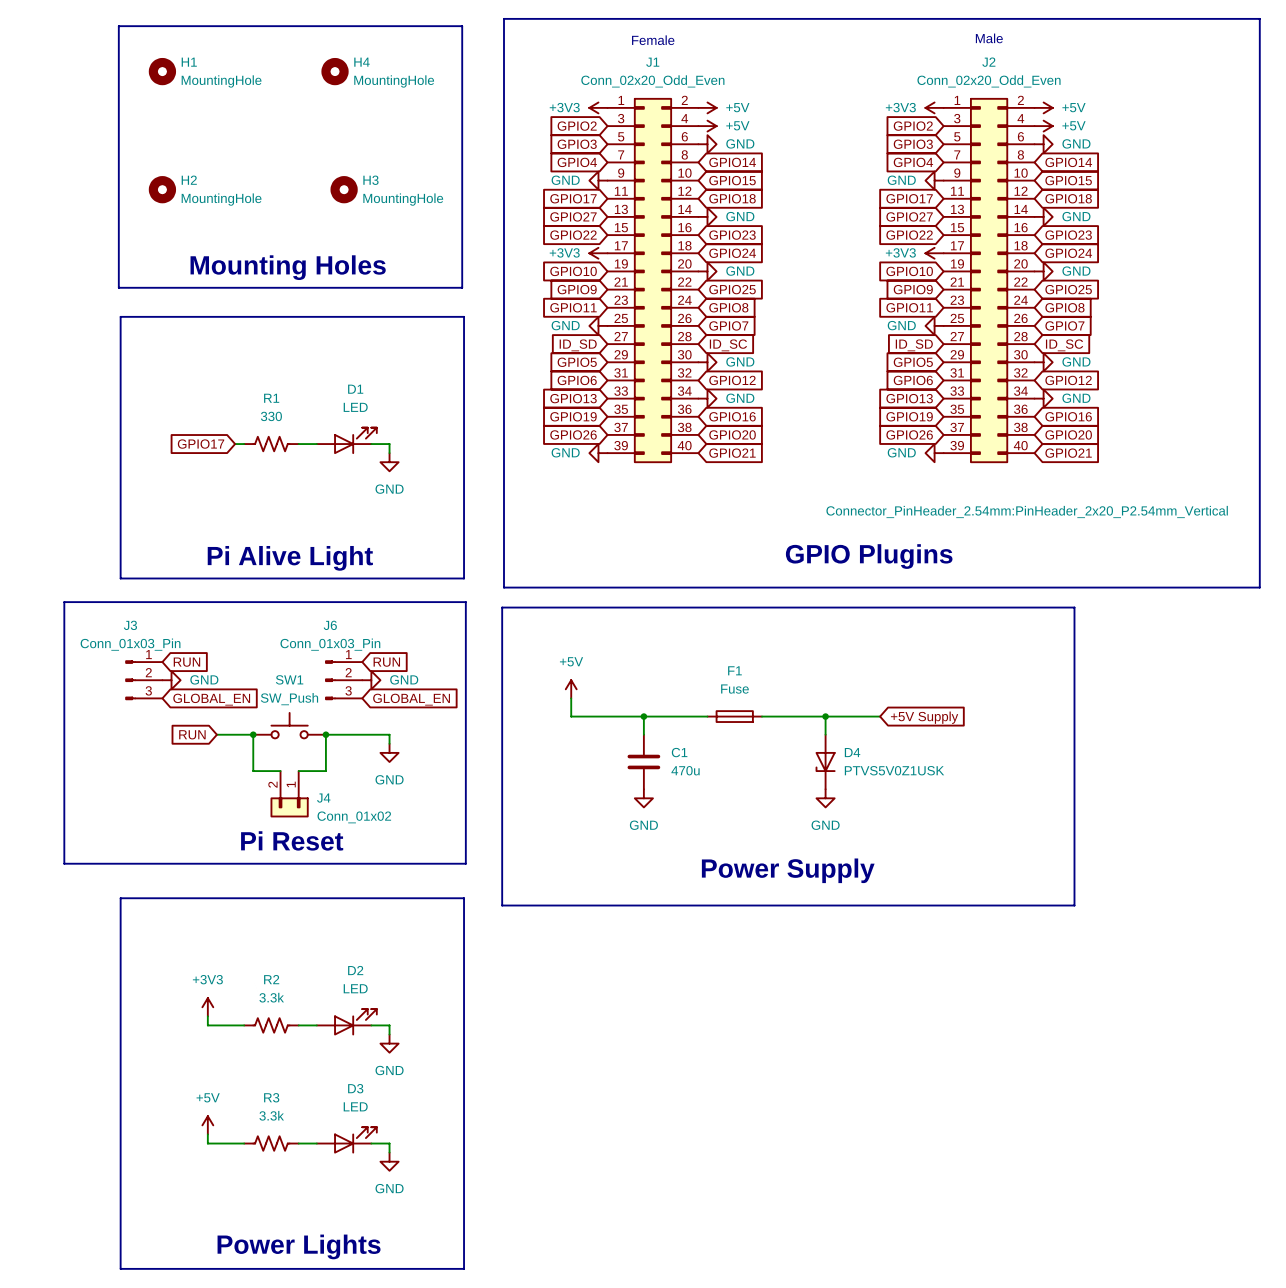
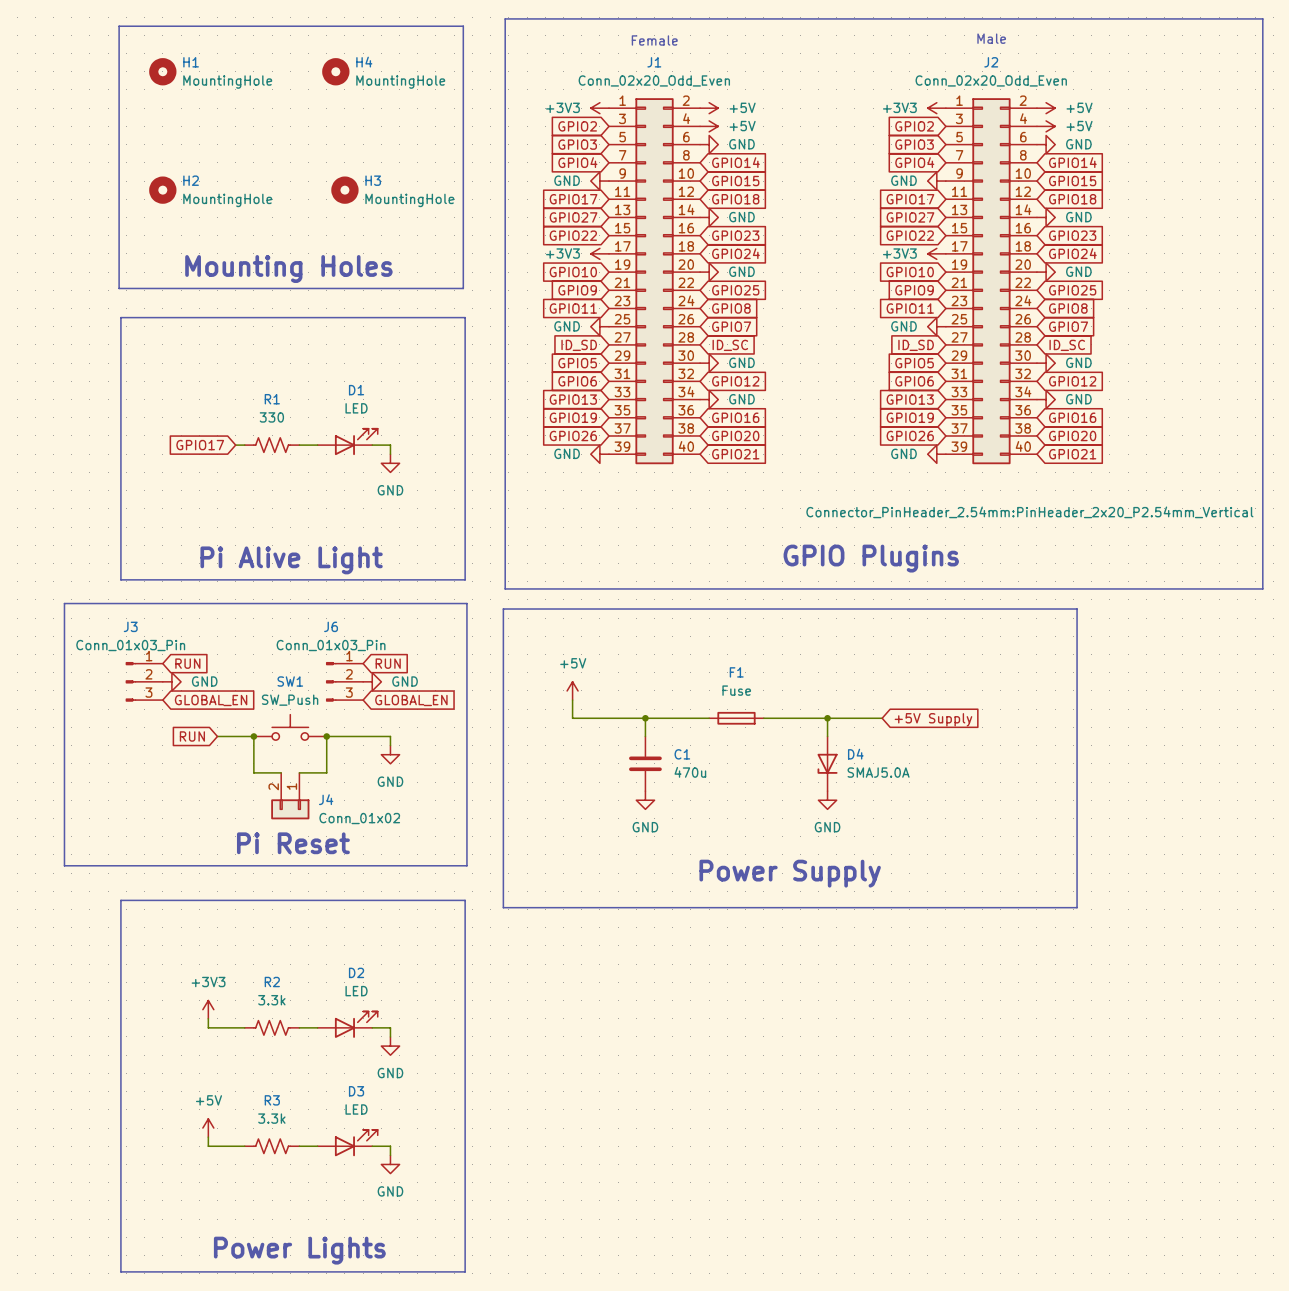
D4 value: PTVS5V0Z1USK (894, 770) -> SMAJ5.0A (878, 772)

